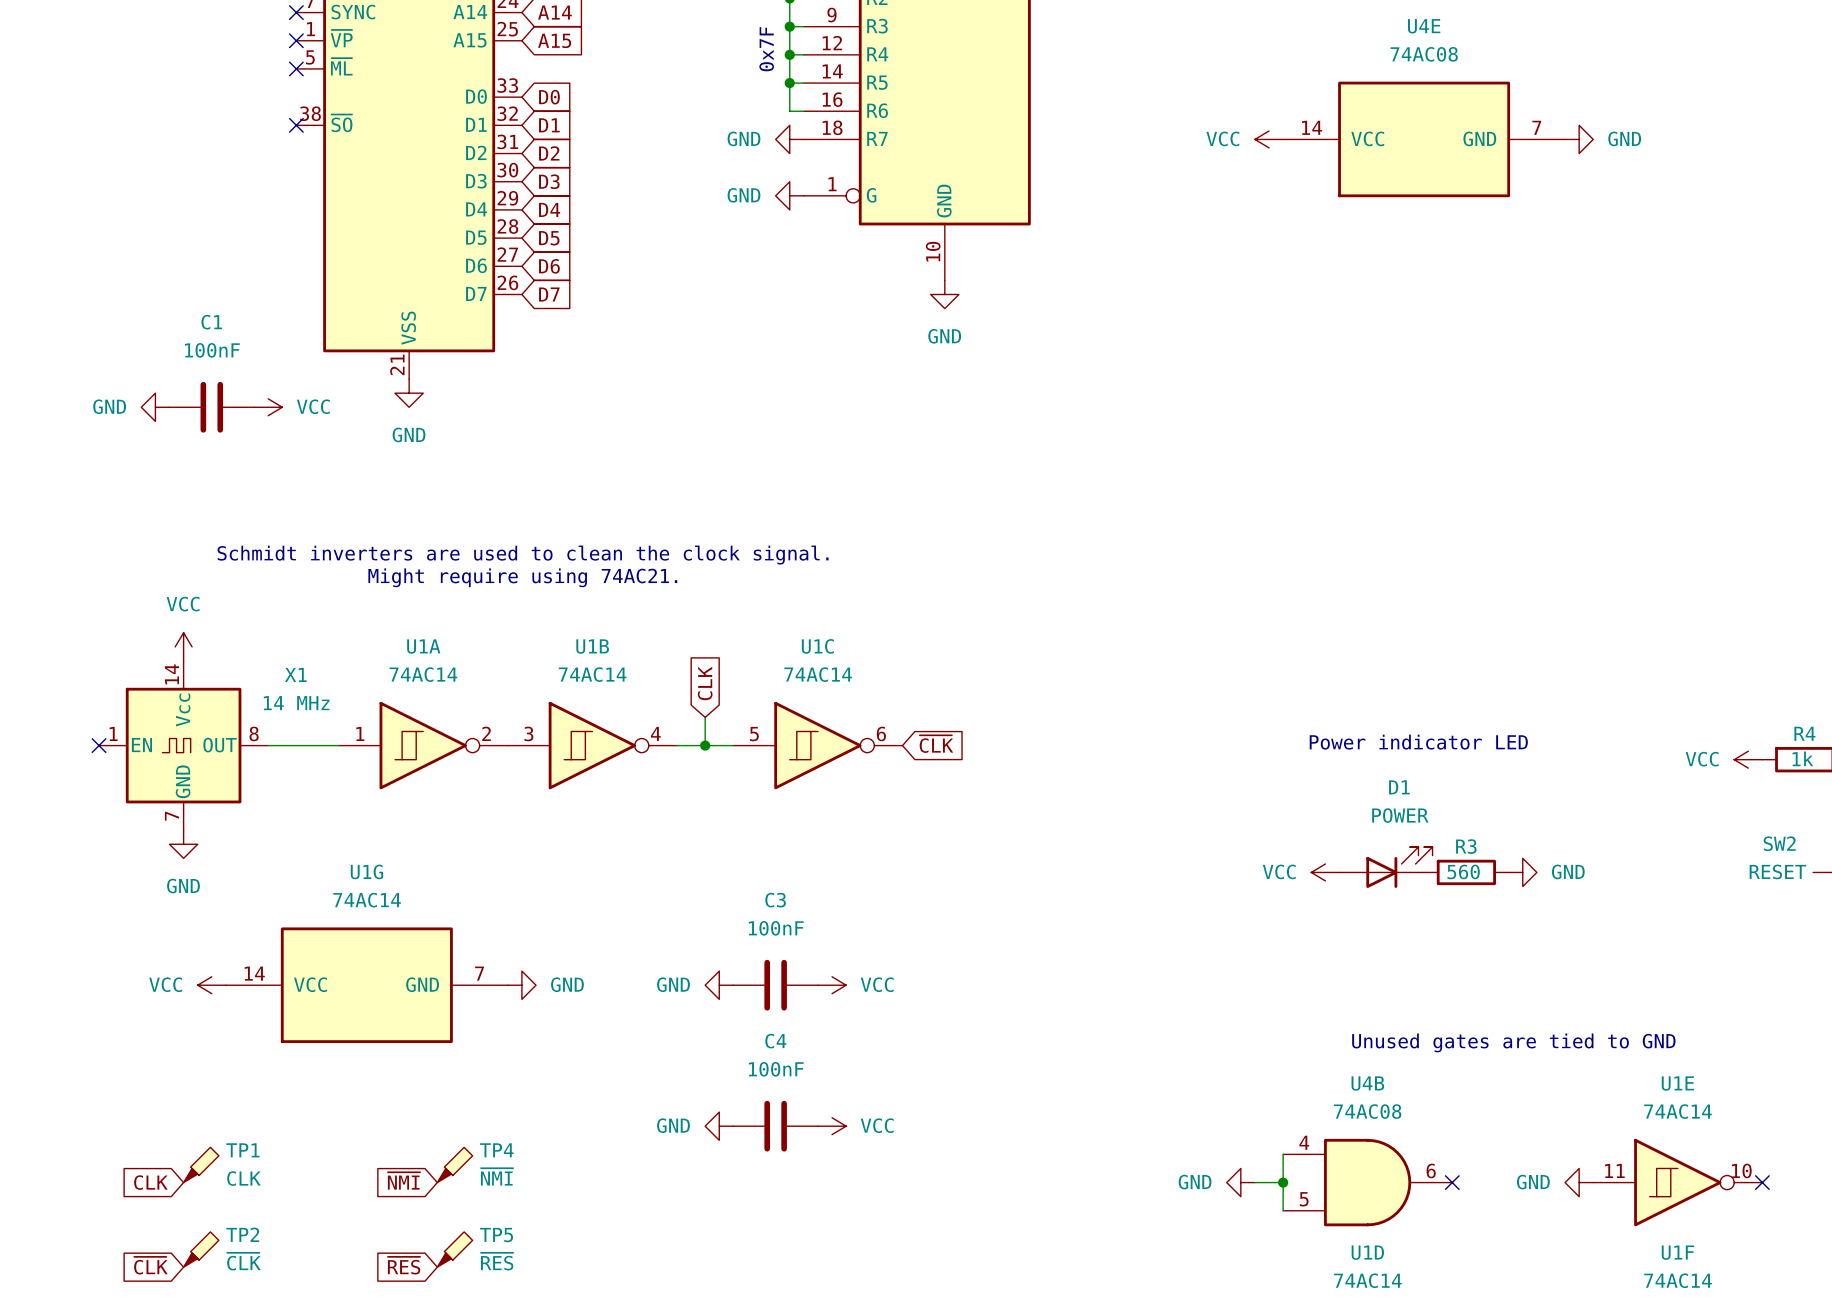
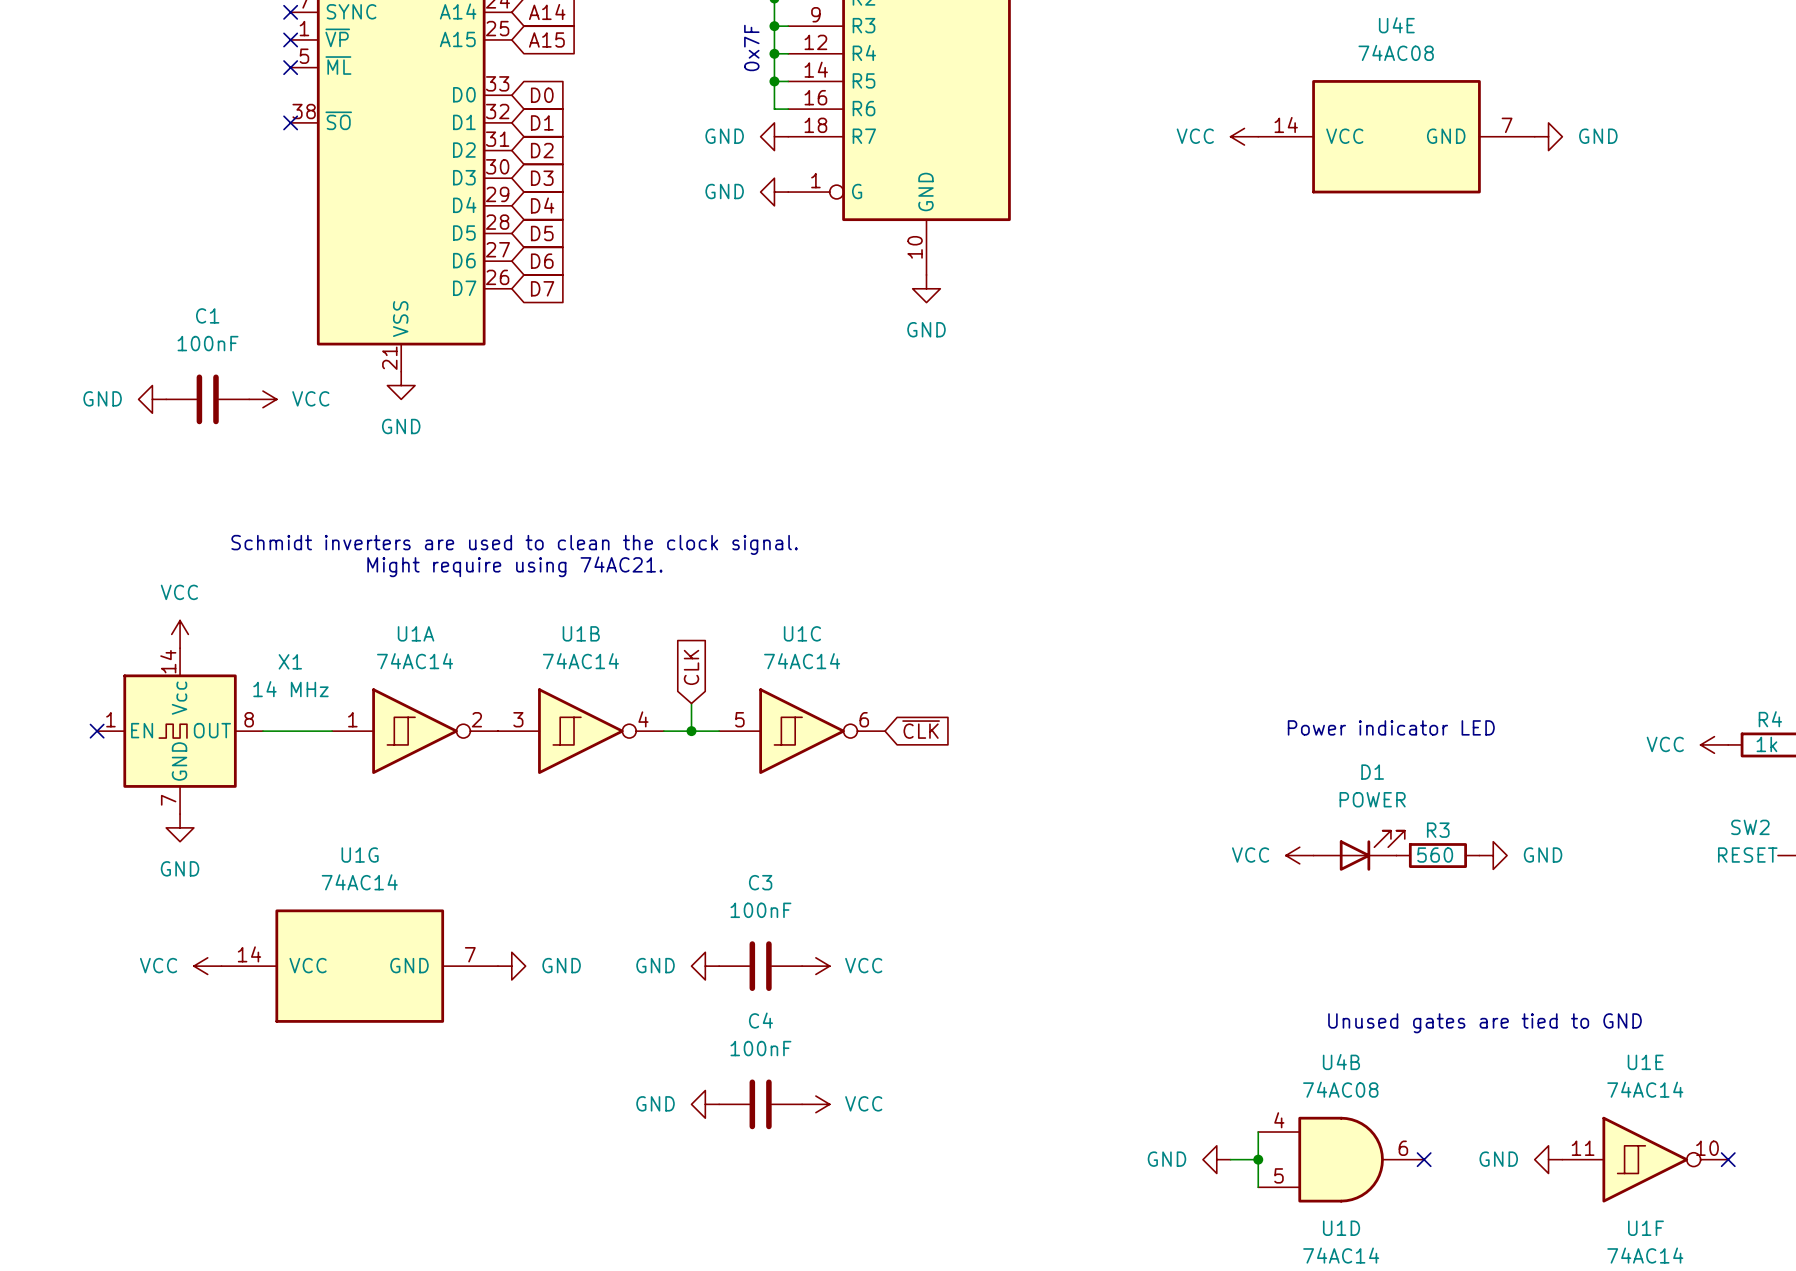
TP1: CLK (201, 1164) -> none
TP4: ~{NMI} (454, 1164) -> none
global label: ~{NMI} (403, 1180) -> none
global label: CLK (150, 1182) -> none
TP2: ~{CLK} (201, 1249) -> none
TP5: ~{RES} (454, 1249) -> none
global label: ~{CLK} (150, 1265) -> none
global label: ~{RES} (404, 1265) -> none

